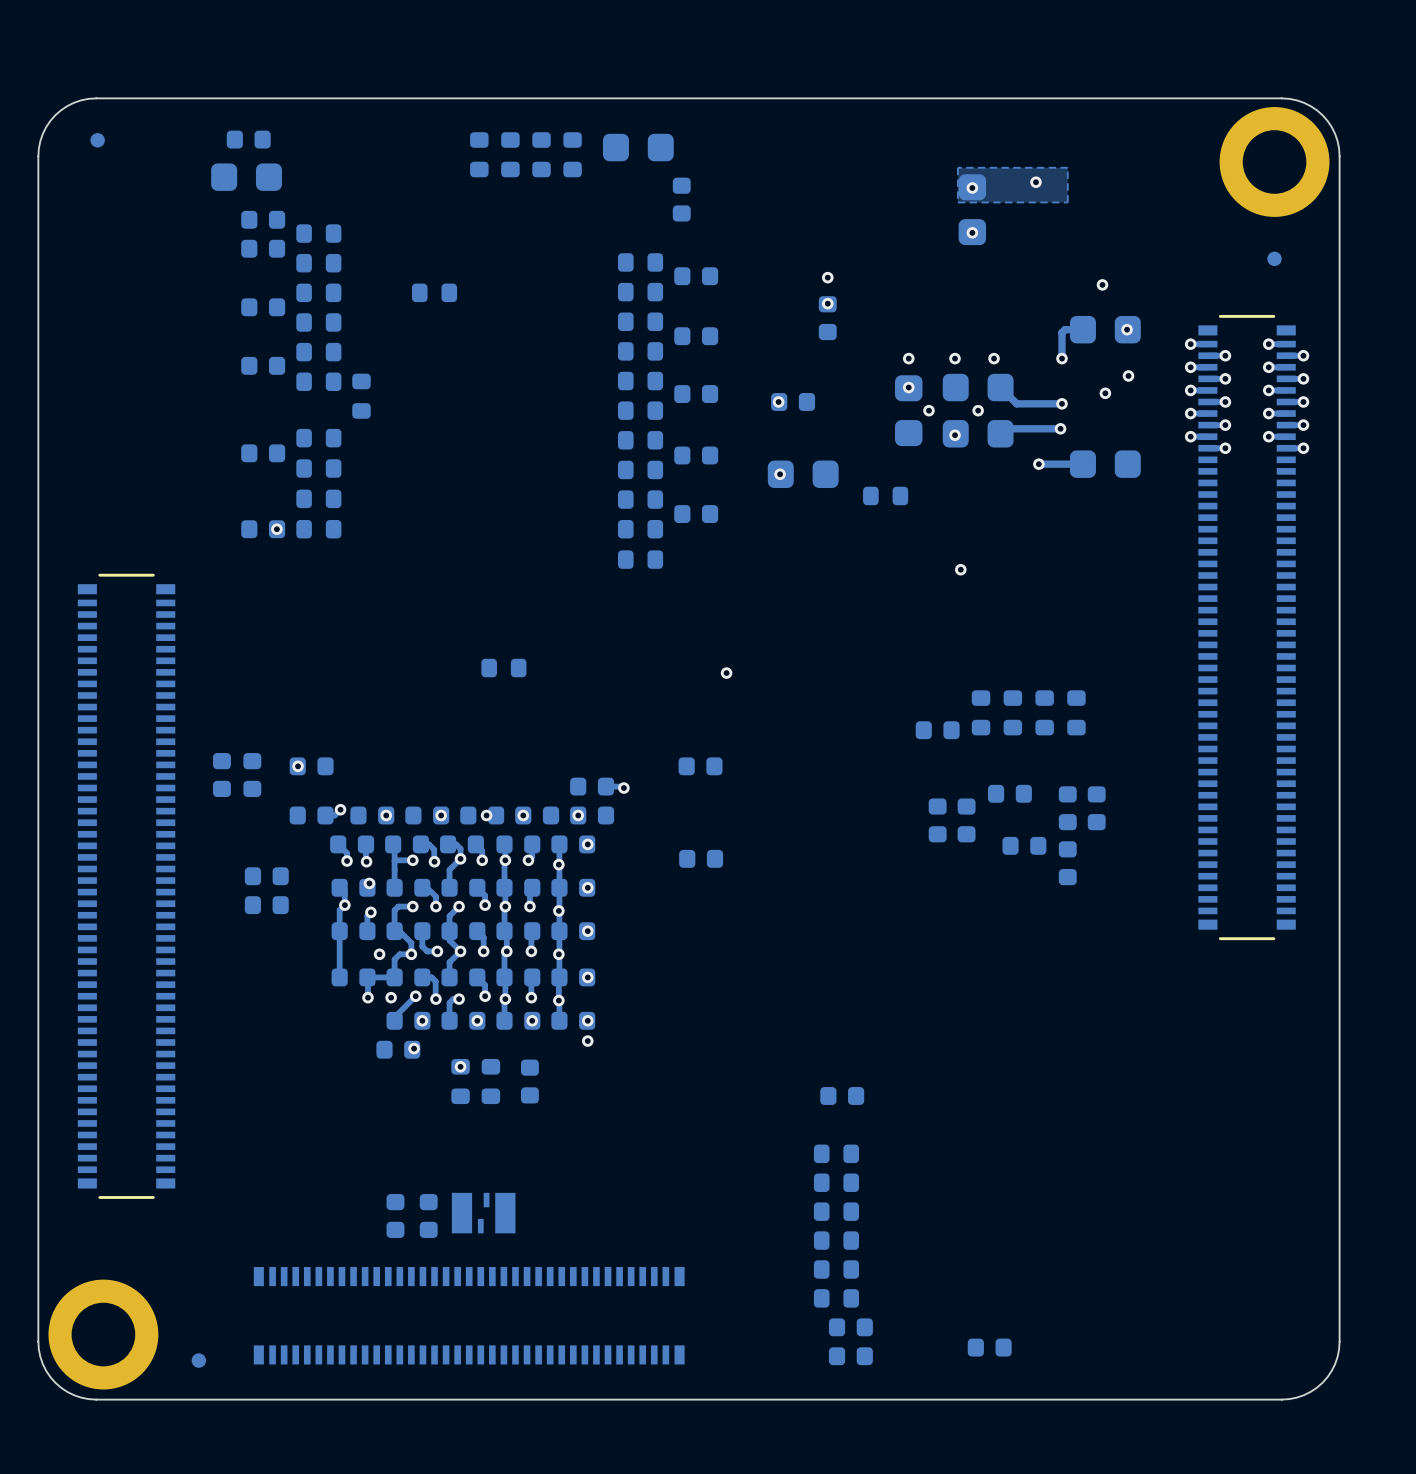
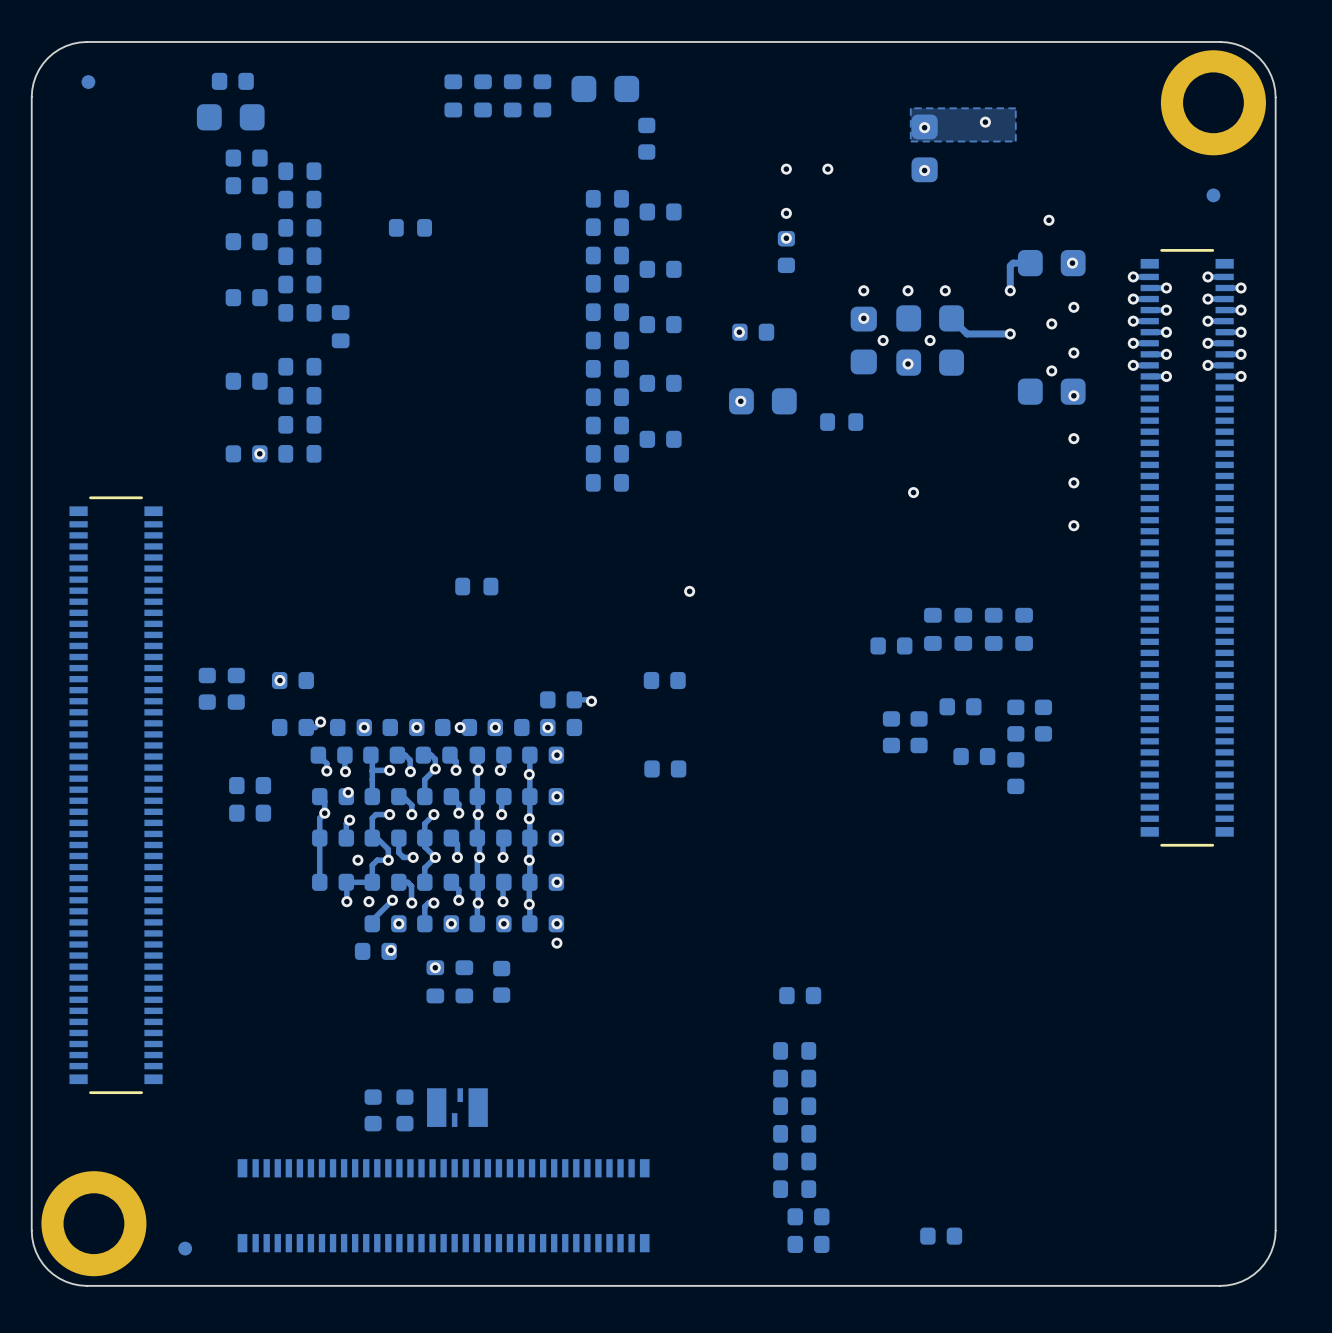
via: none -> (786, 169)
via: none -> (827, 169)
via: none -> (1073, 352)
track: (1060, 428) (1005, 428) (1000, 433) -> none
via: (1060, 428) -> none
via: none -> (1051, 370)
via: (1038, 464) -> none
track: (1082, 464) (1038, 464) -> none
via: none -> (1073, 395)
via: none -> (1073, 438)
via: none -> (1073, 482)
via: none -> (1073, 525)

